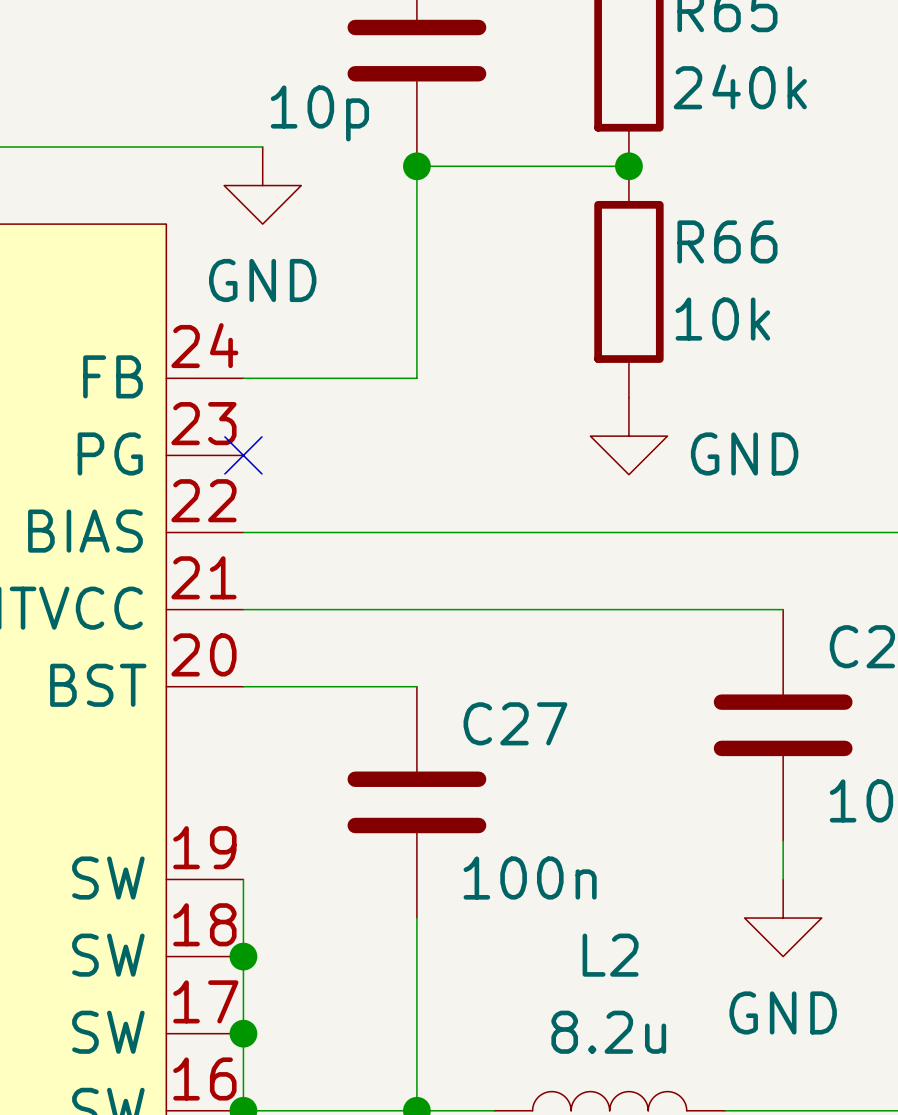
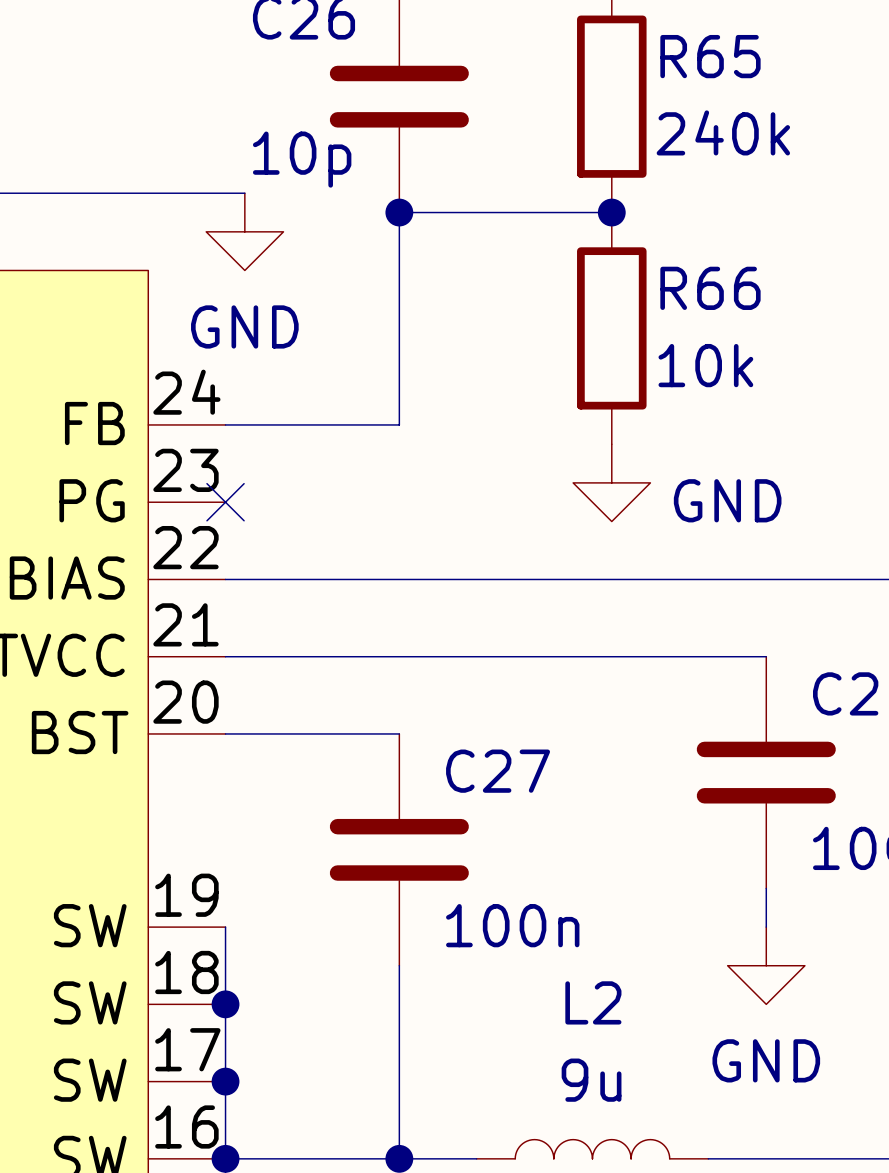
L2 value: 8.2u (608, 1032) -> 9u (591, 1080)

